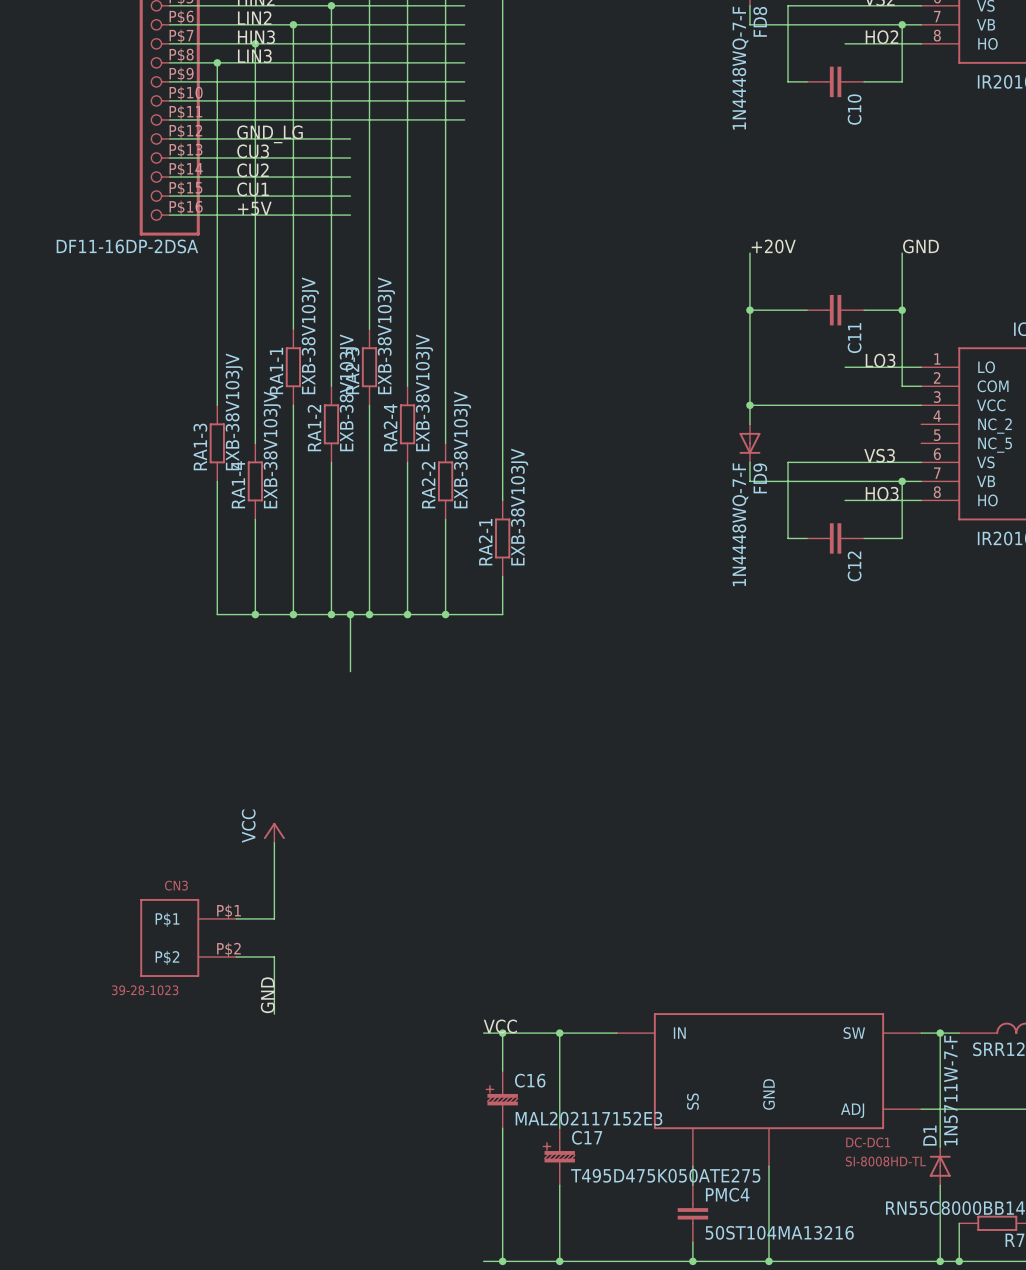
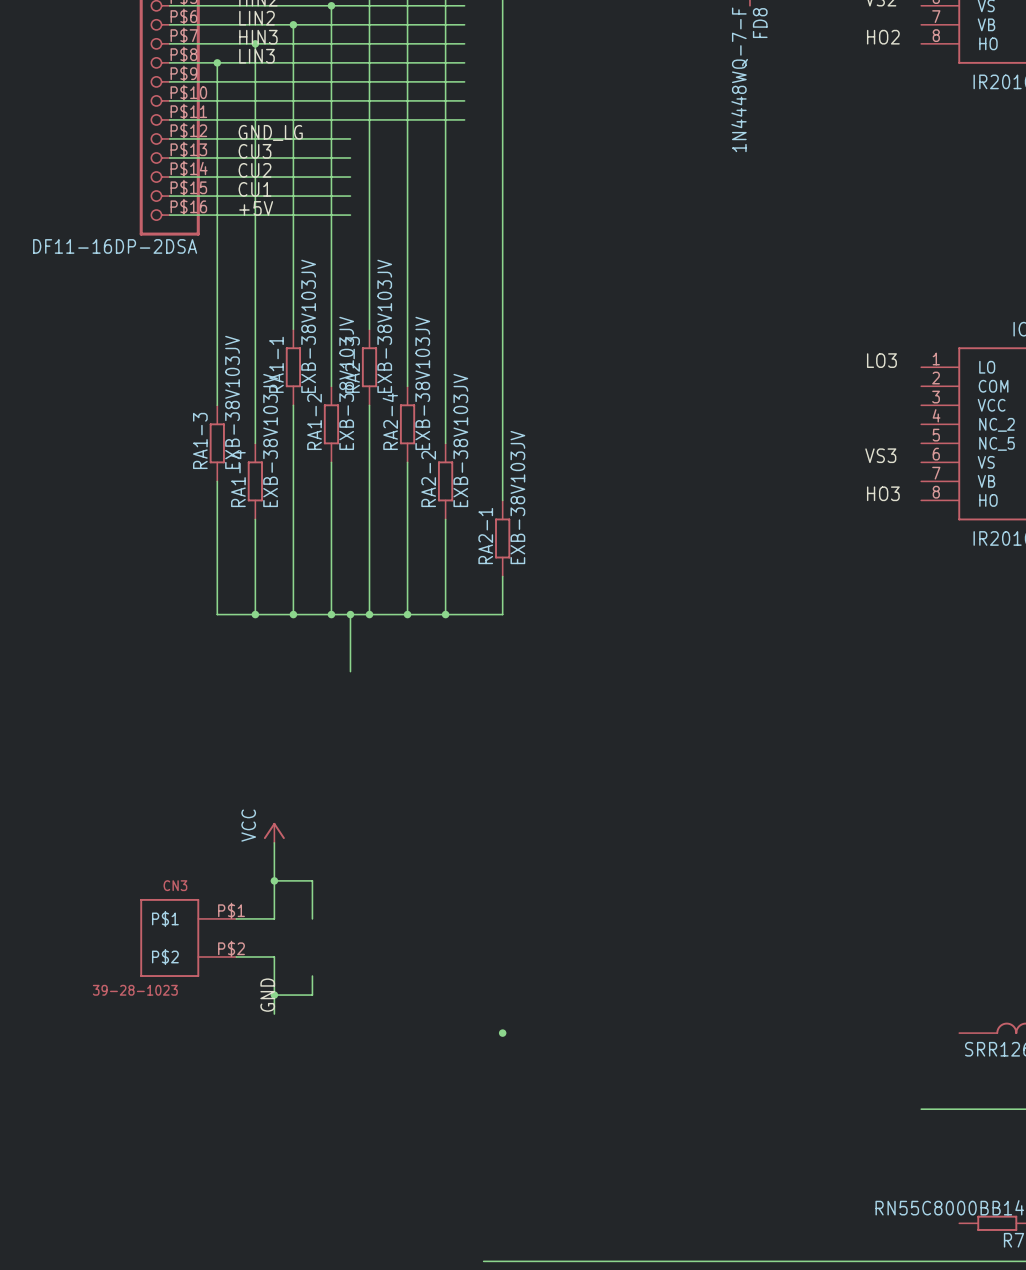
wire: (749, 5) (749, 24) (921, 24) -> none
wire: (921, 5) (788, 5) (788, 81) (807, 81) -> none
wire: (902, 24) (902, 81) (864, 81) -> none
junction: (902, 24) -> none
wire: (845, 43) (921, 43) -> none
C10: (835, 81) -> none
label: +20V (773, 246) -> none
label: GND (920, 246) -> none
wire: (749, 253) (749, 424) -> none
wire: (902, 253) (902, 386) (921, 386) -> none
wire: (749, 310) (807, 310) -> none
junction: (749, 310) -> none
C11: (835, 310) -> none
wire: (864, 310) (902, 310) -> none
junction: (902, 310) -> none
wire: (845, 367) (921, 367) -> none
wire: (749, 405) (921, 405) -> none
junction: (749, 405) -> none
FD9: 1N4448WQ-7-F (749, 443) -> none
wire: (749, 462) (749, 481) (921, 481) -> none
wire: (921, 462) (788, 462) (788, 538) (807, 538) -> none
wire: (902, 481) (902, 538) (864, 538) -> none
junction: (902, 481) -> none
wire: (845, 500) (921, 500) -> none
C12: (835, 538) -> none
wire: none -> (274, 880) (312, 880) (312, 918)
junction: none -> (274, 880)
wire: none -> (312, 976) (312, 995) (274, 995)
junction: none -> (274, 995)
label: VCC (500, 1026) -> none
wire: (483, 1033) (616, 1033) -> none
wire: (502, 1033) (502, 1071) -> none
wire: (559, 1033) (559, 1128) -> none
junction: (559, 1033) -> none
wire: (921, 1033) (959, 1033) -> none
wire: (940, 1033) (940, 1147) -> none
junction: (940, 1033) -> none
DC-DC1: SI-8008HD-TL (769, 1089) -> none
C16: MAL202117152E3 (501, 1099) -> none
wire: (502, 1128) (502, 1261) -> none
C17: T495D475K050ATE275 (558, 1156) -> none
wire: (692, 1166) (692, 1185) -> none
wire: (769, 1166) (769, 1261) -> none
D1: 1N5711W-7-F (940, 1166) -> none
wire: (559, 1185) (559, 1261) -> none
wire: (940, 1185) (940, 1261) -> none
PMC4: 50ST104MA13216 (692, 1213) -> none
wire: (959, 1223) (959, 1261) -> none
wire: (692, 1242) (692, 1261) -> none
junction: (502, 1261) -> none
junction: (559, 1261) -> none
junction: (692, 1261) -> none
junction: (769, 1261) -> none
junction: (940, 1261) -> none
junction: (959, 1261) -> none

